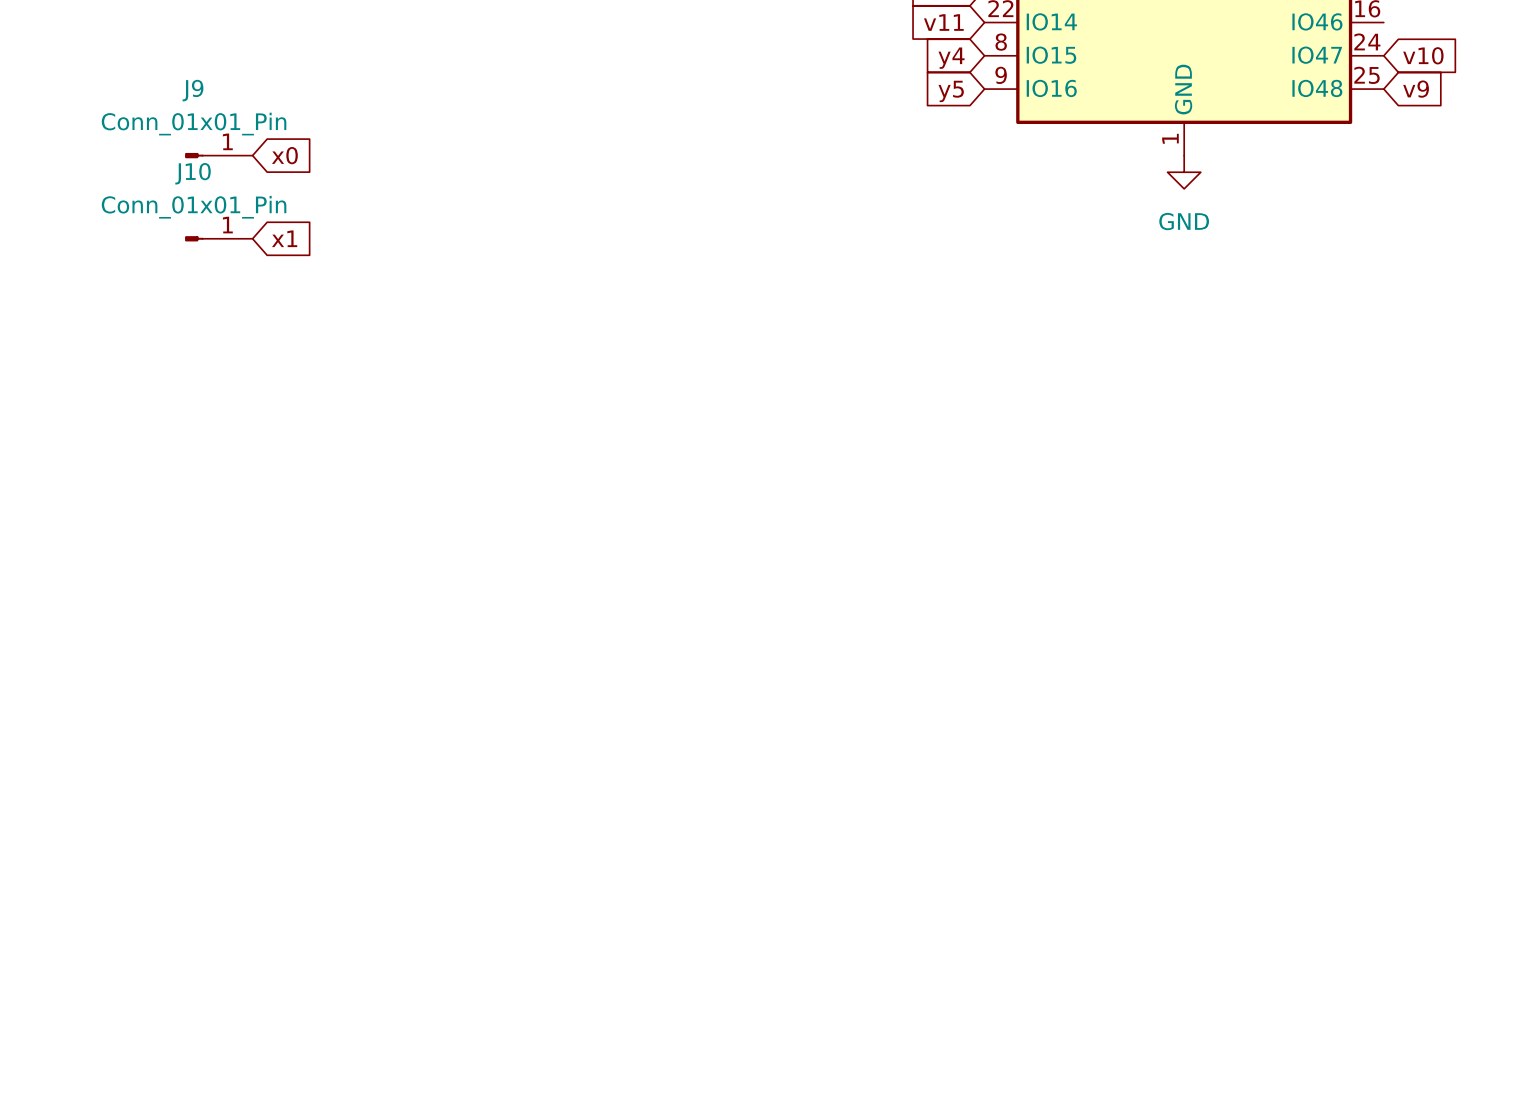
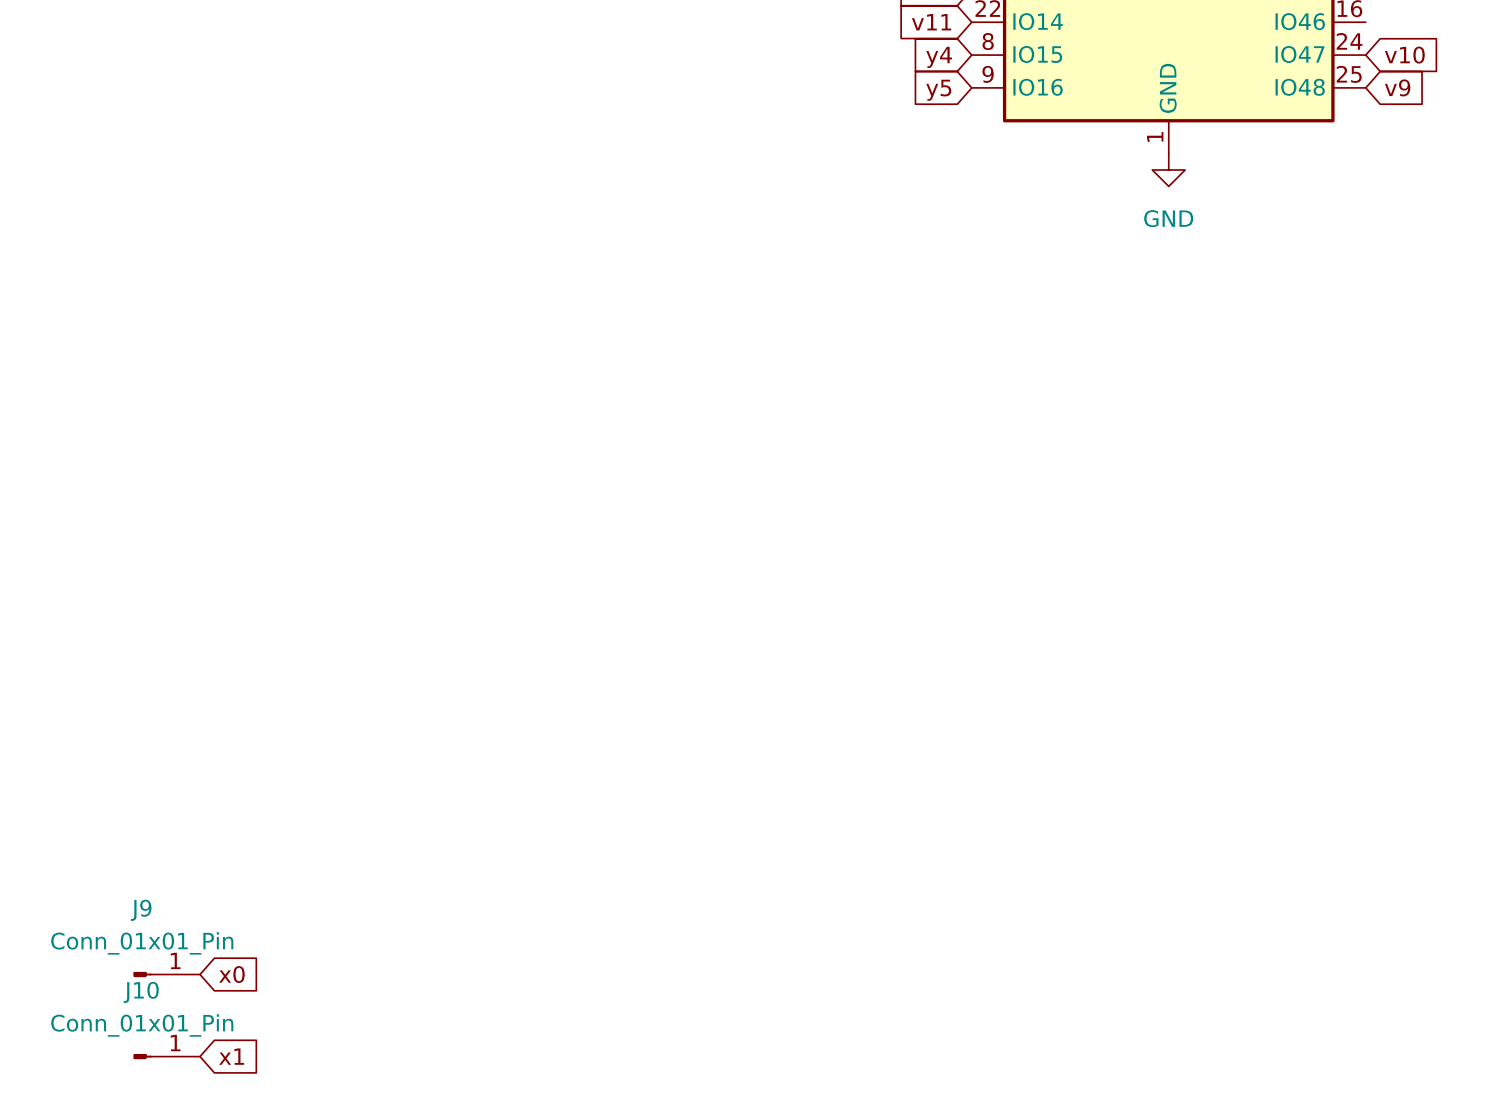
J9 position: (218, 155) -> (166, 974)
global label: x0 (284, 155) -> none
J10 position: (218, 238) -> (166, 1056)
global label: x1 (284, 238) -> none
global label: none -> x0 (231, 974)
global label: none -> x1 (231, 1056)

